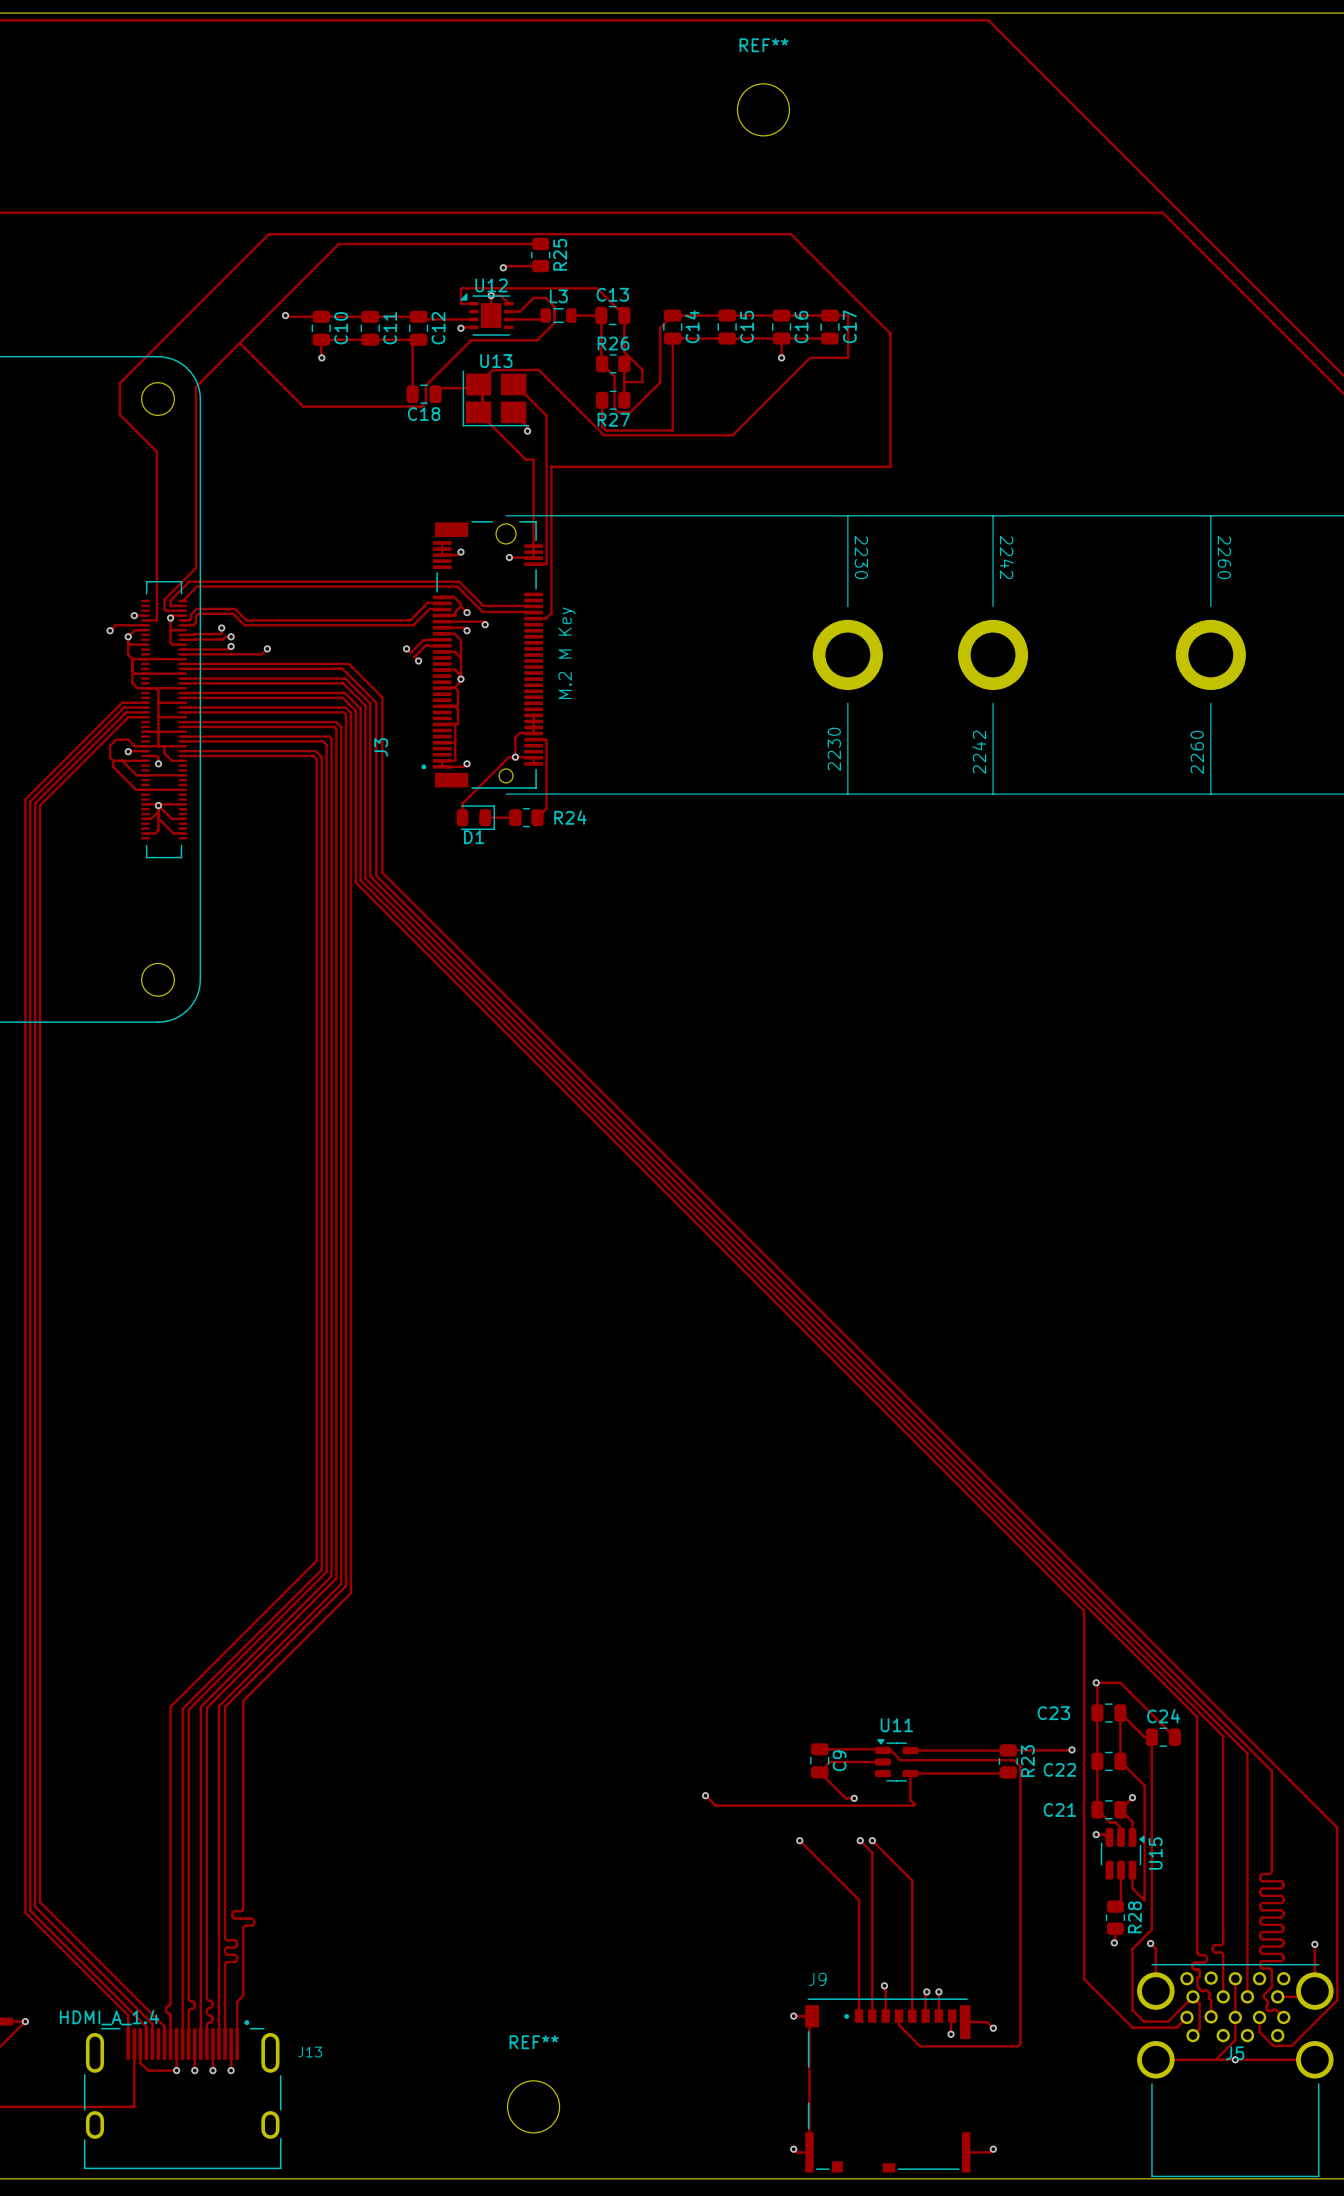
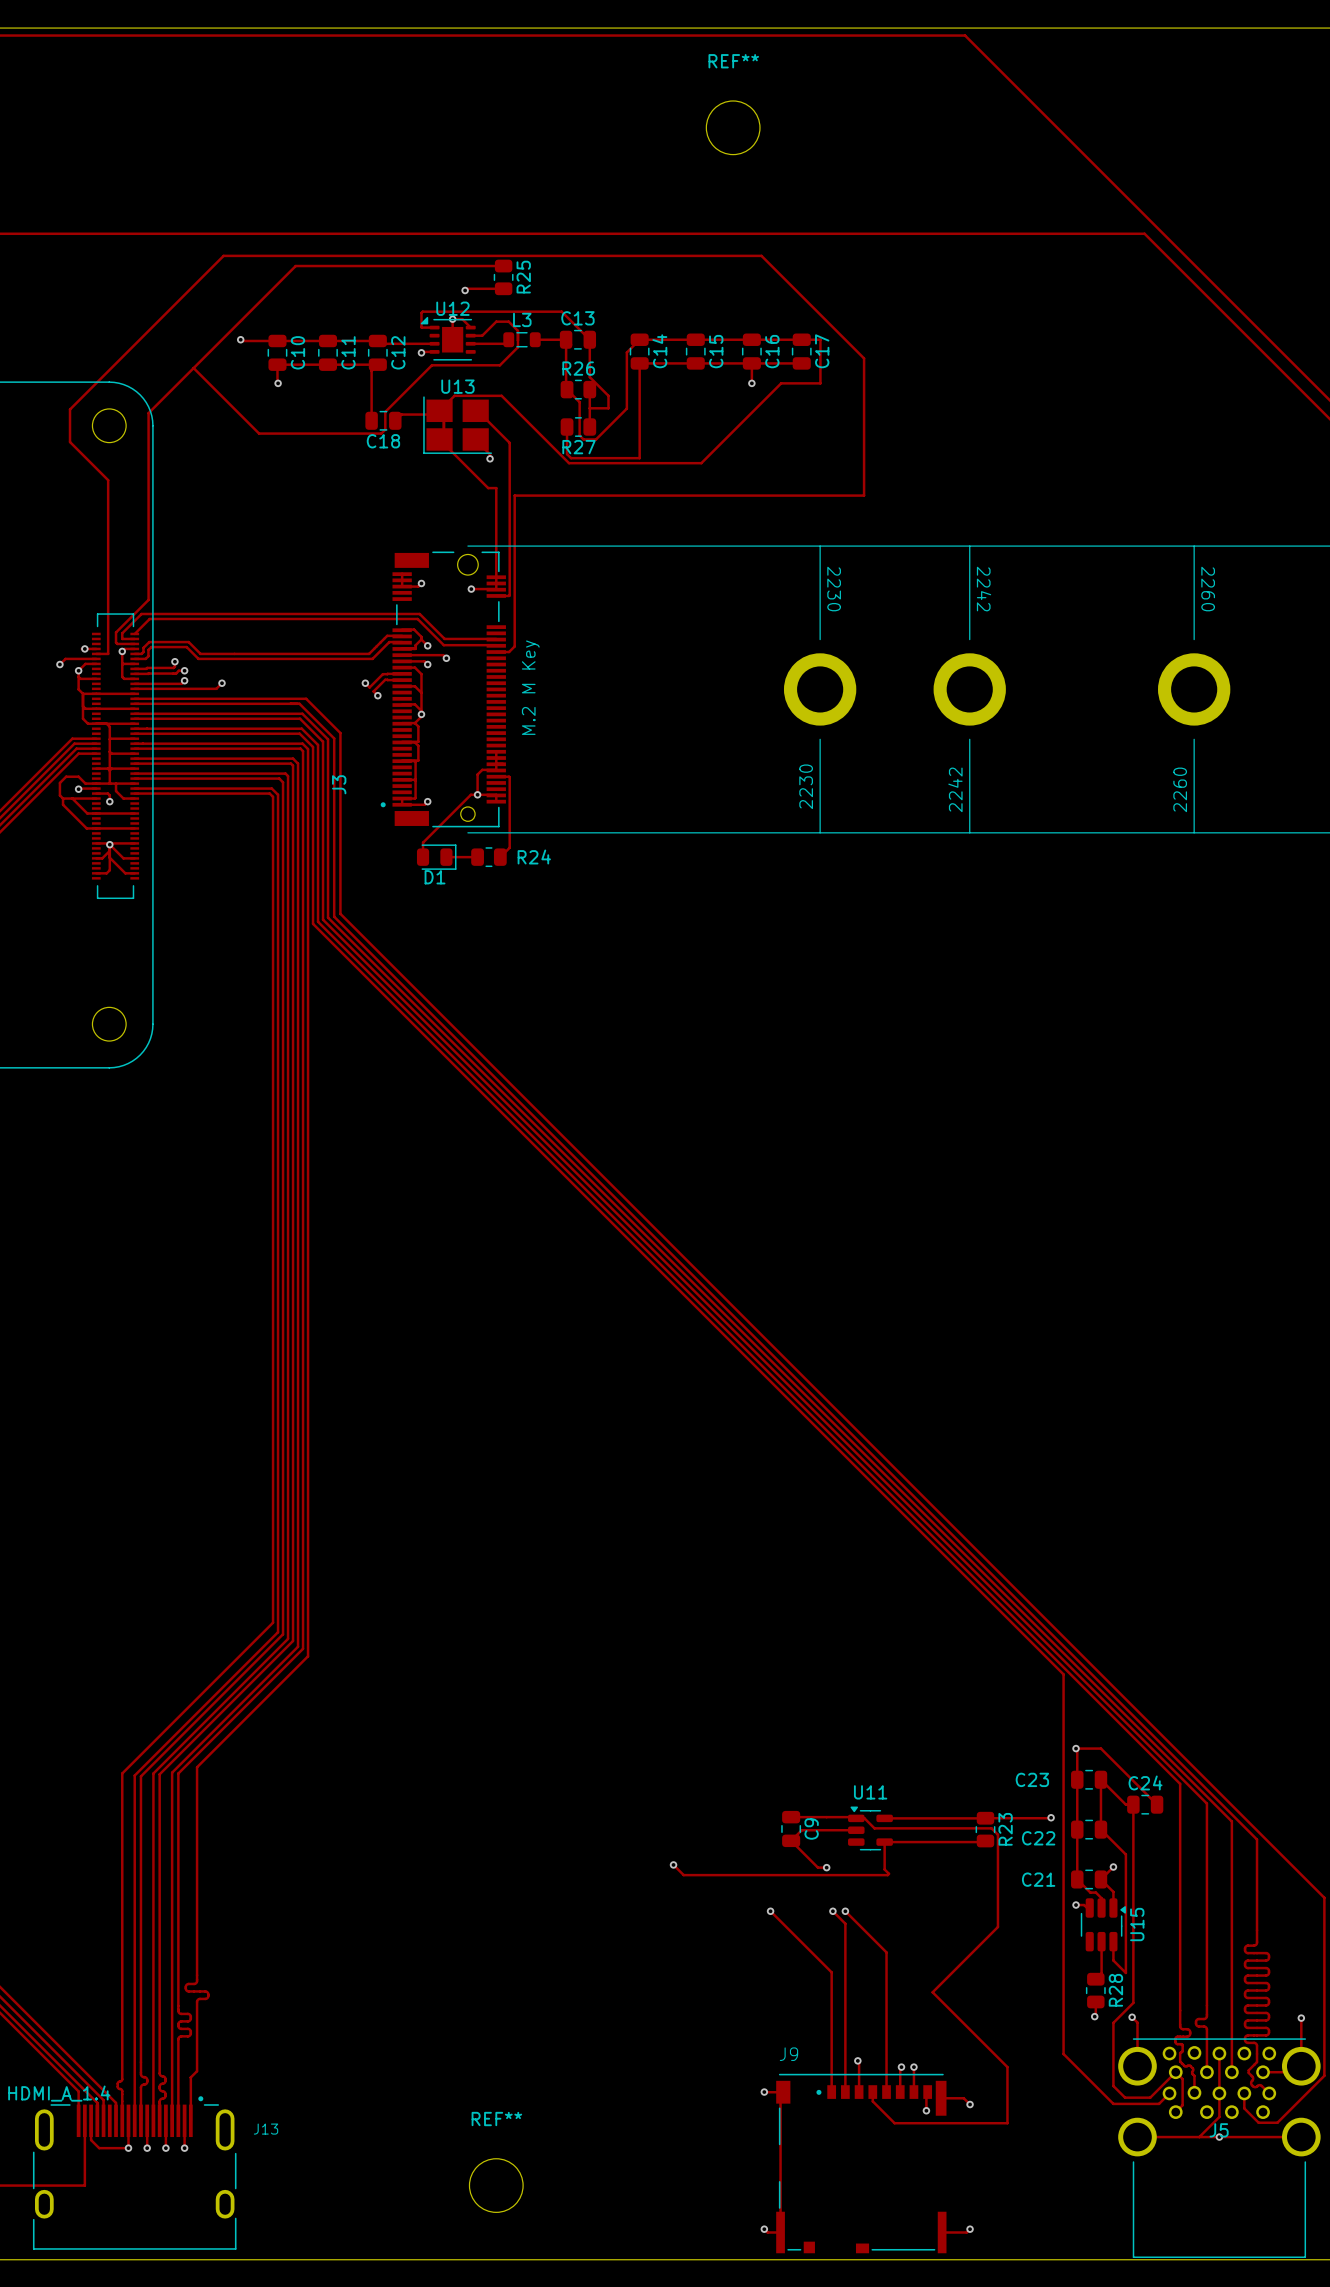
track: (1020, 1855) (1020, 2043) (1017, 2046) -> (997, 1927) (932, 1992) (1007, 2067) (1007, 2123) (994, 2123)

